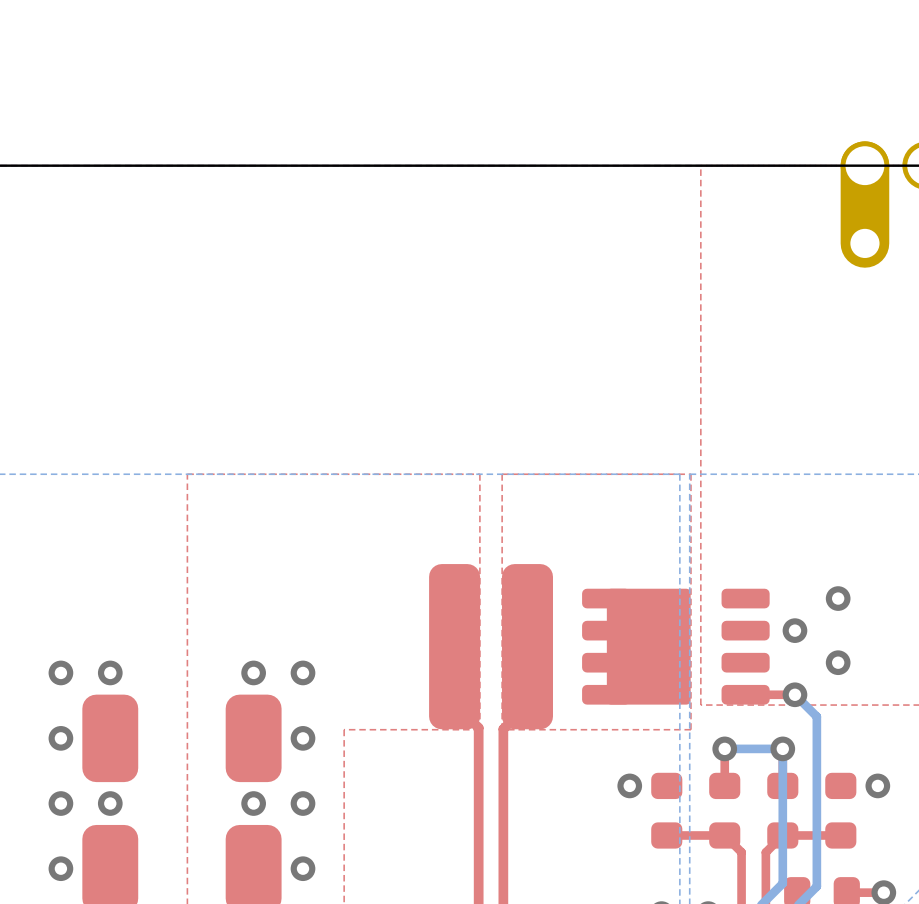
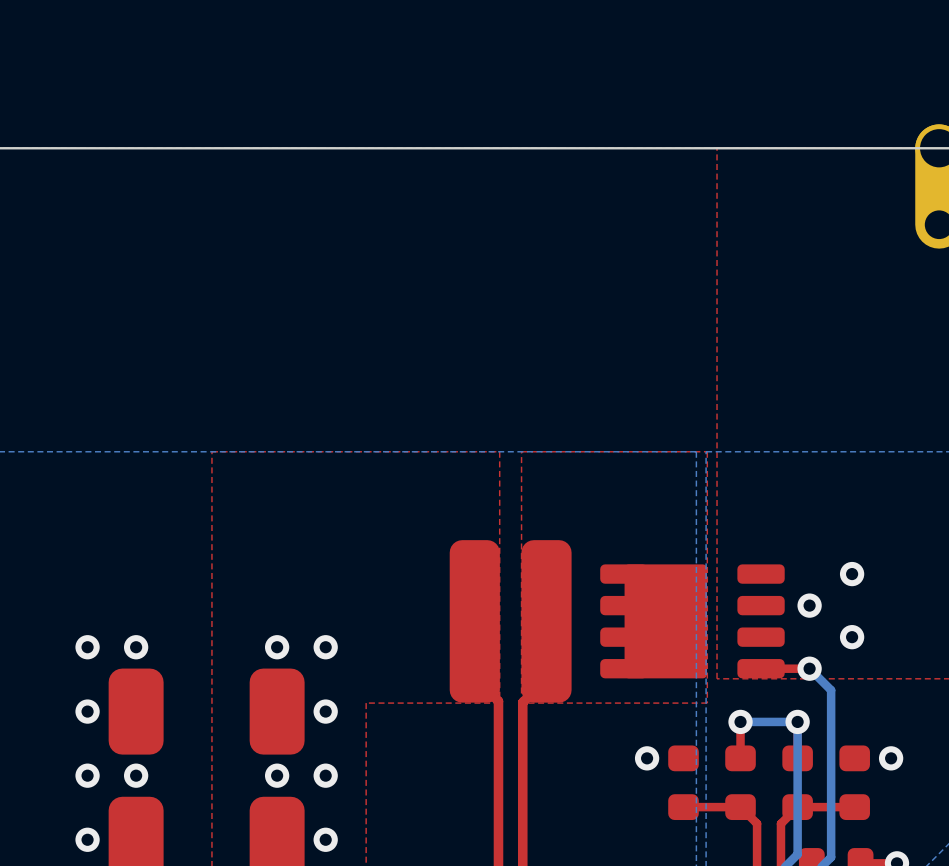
part: (864, 204) -> none

